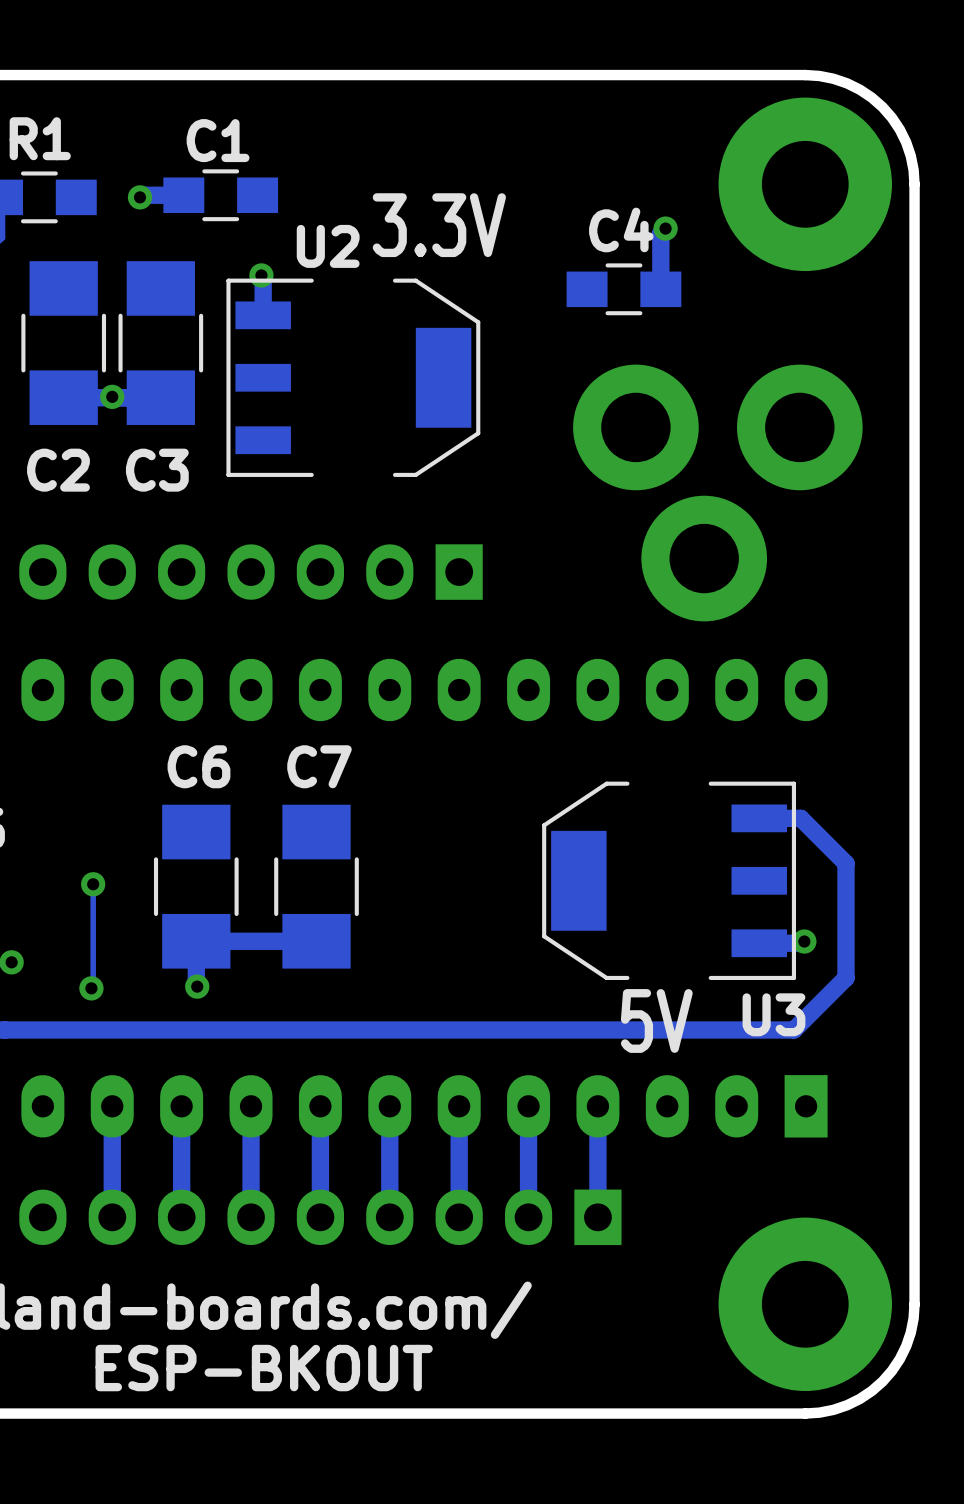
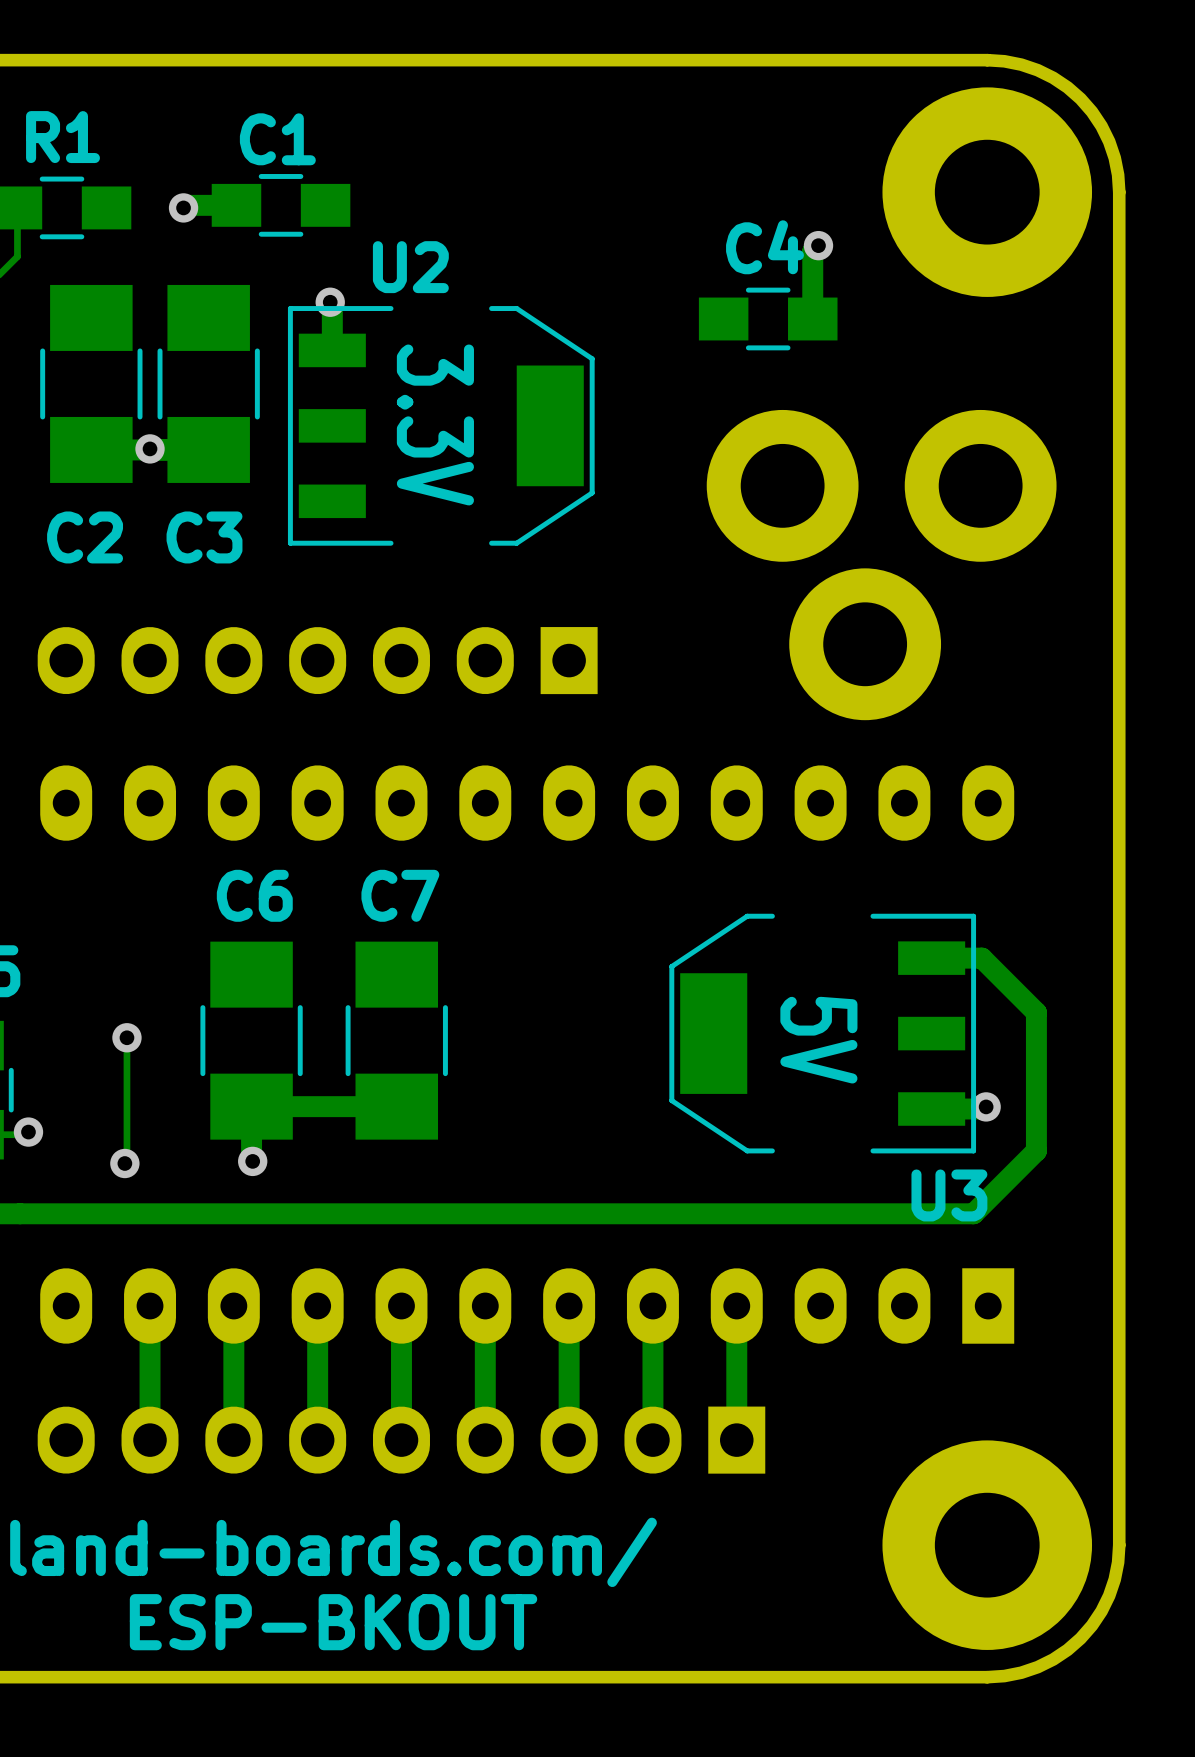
text rotation: 0° (439, 225) -> 90° clockwise (435, 424)
text rotation: 0° (656, 1020) -> 90° clockwise (818, 1040)
text position: 5V (656, 1020) -> 5V (818, 1040)

